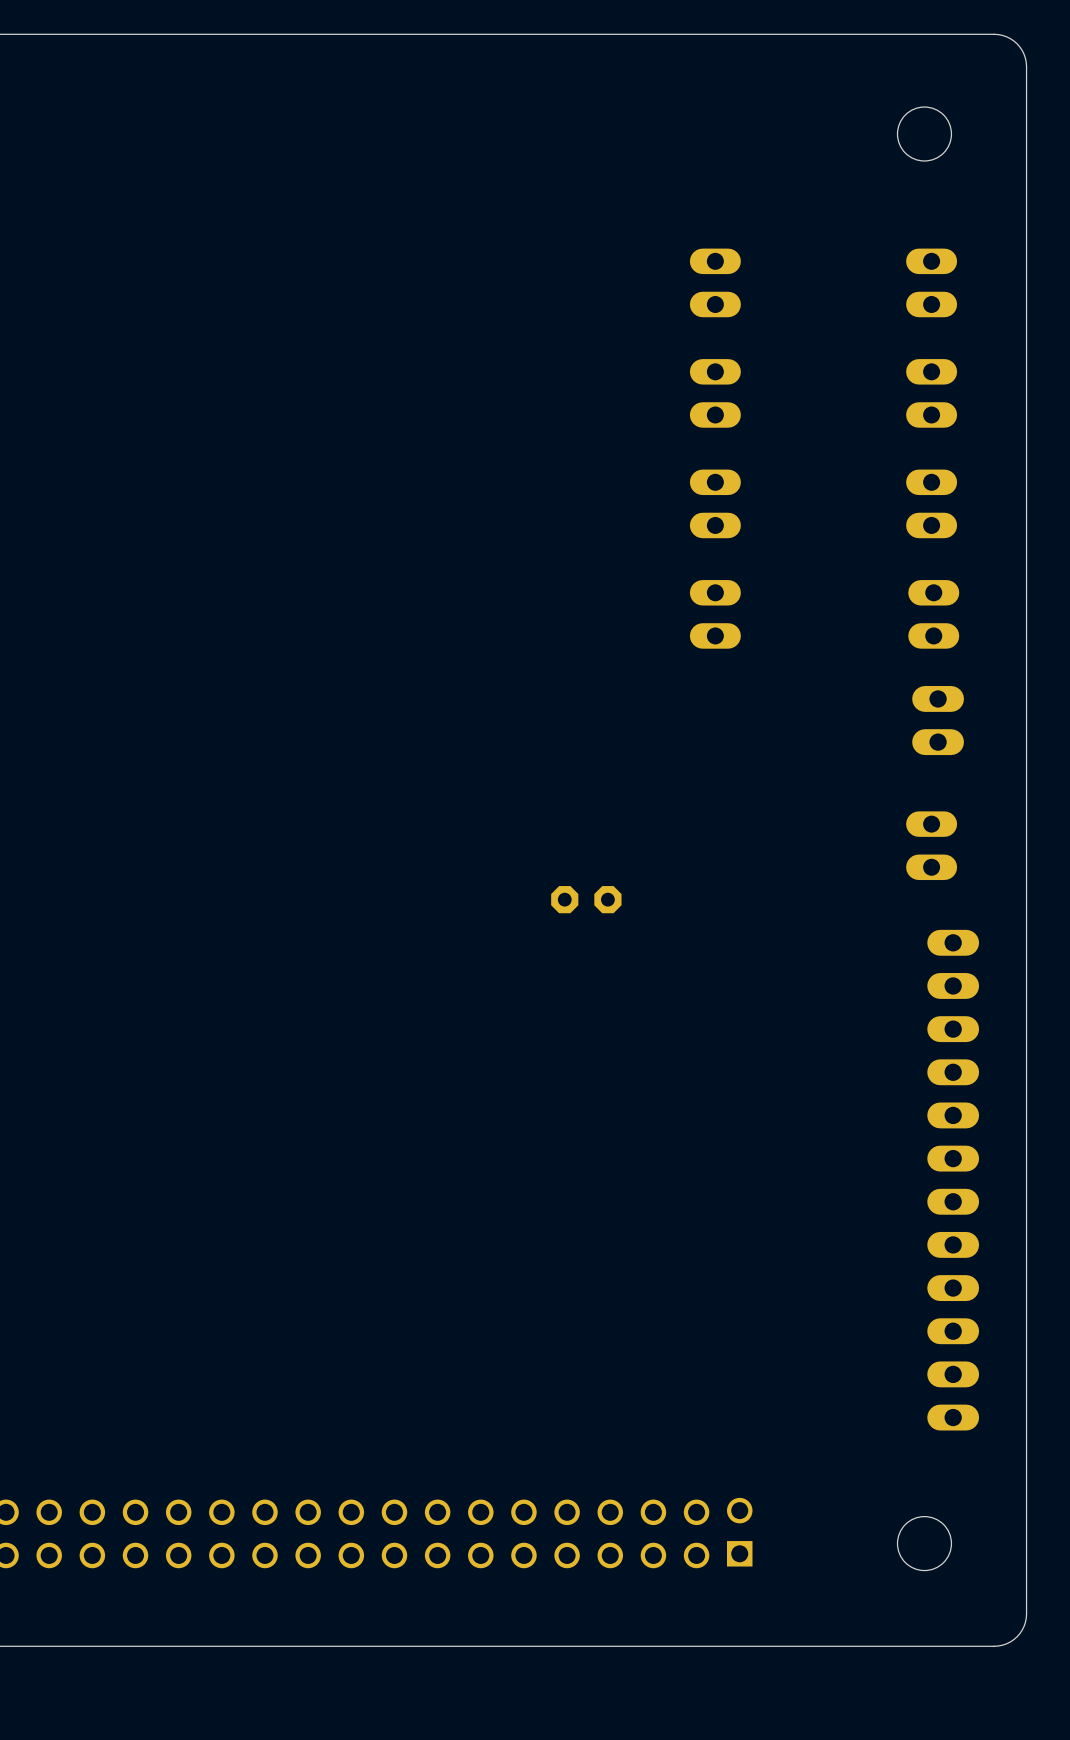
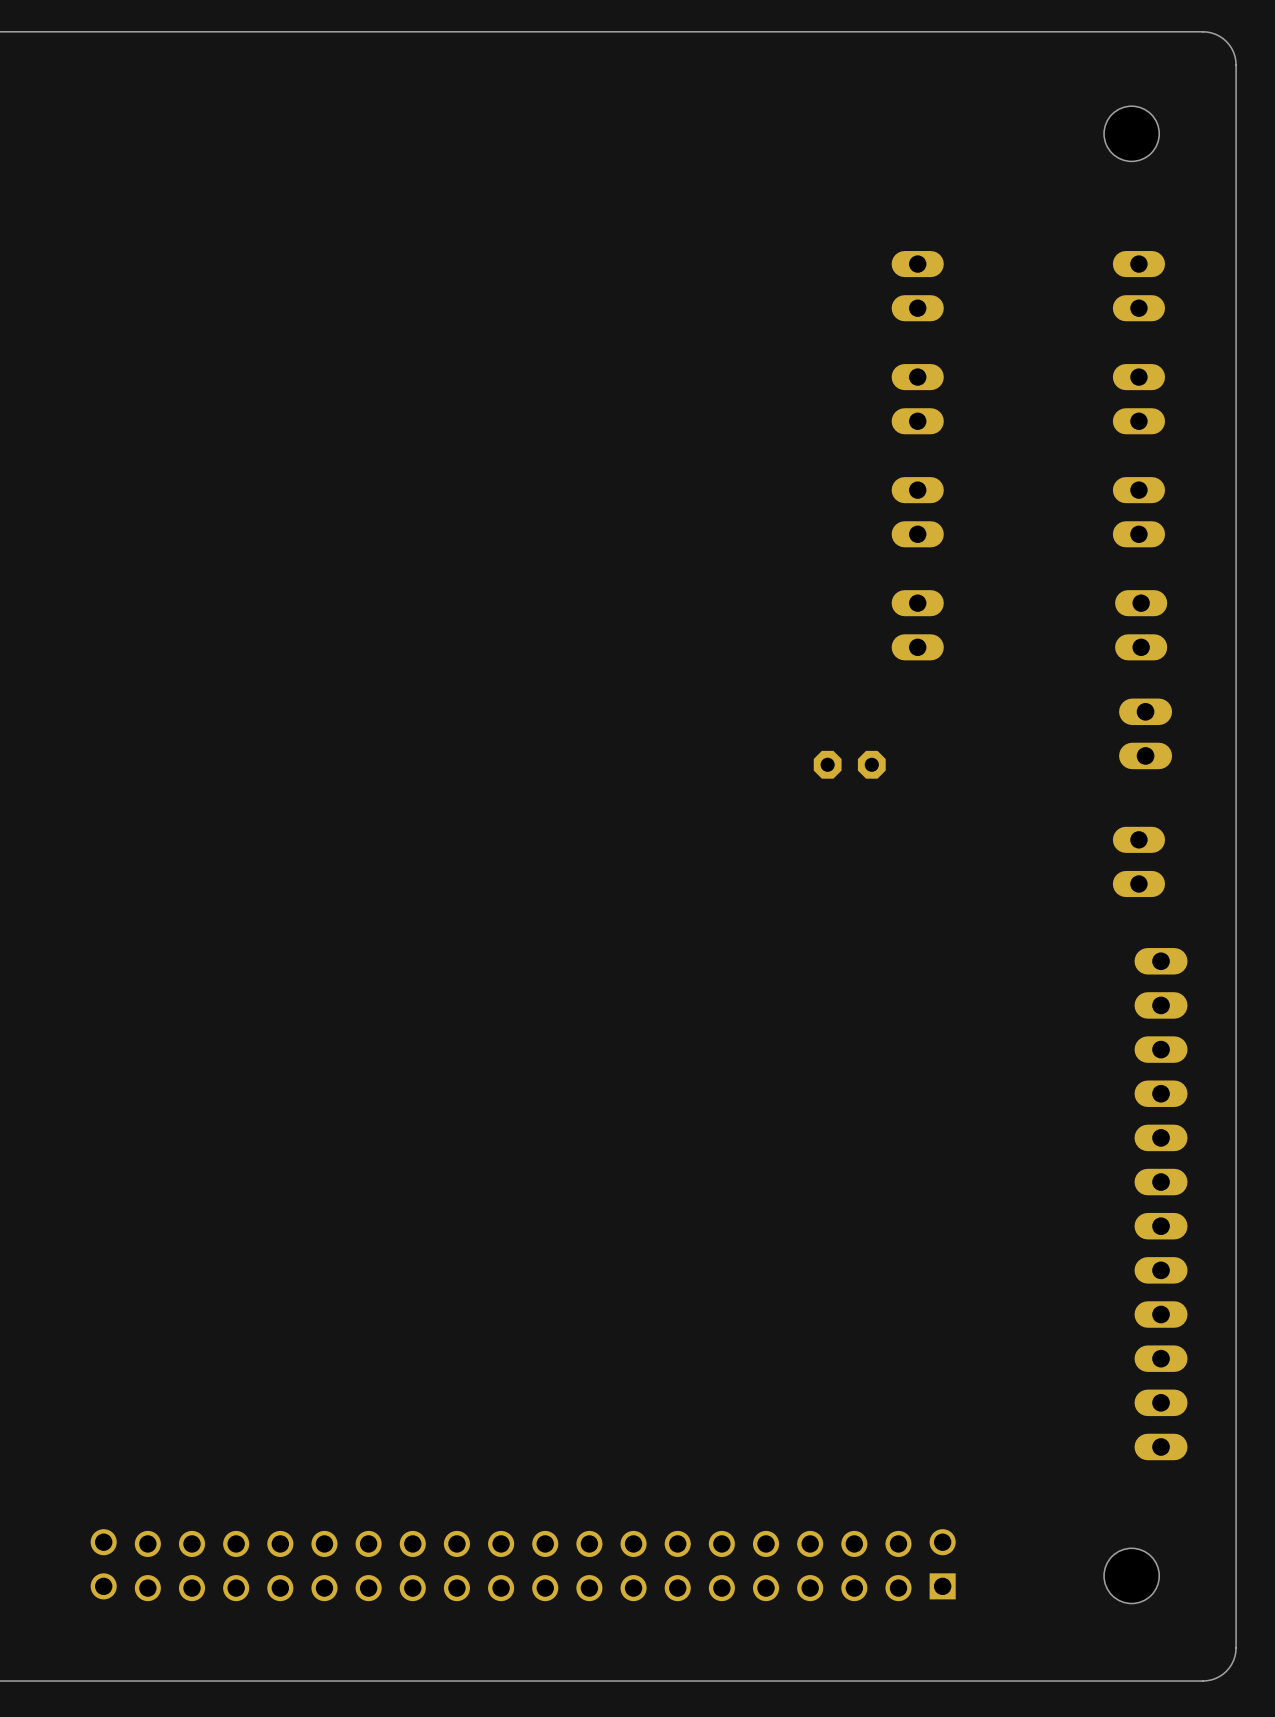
part position: (586, 899) -> (849, 764)

